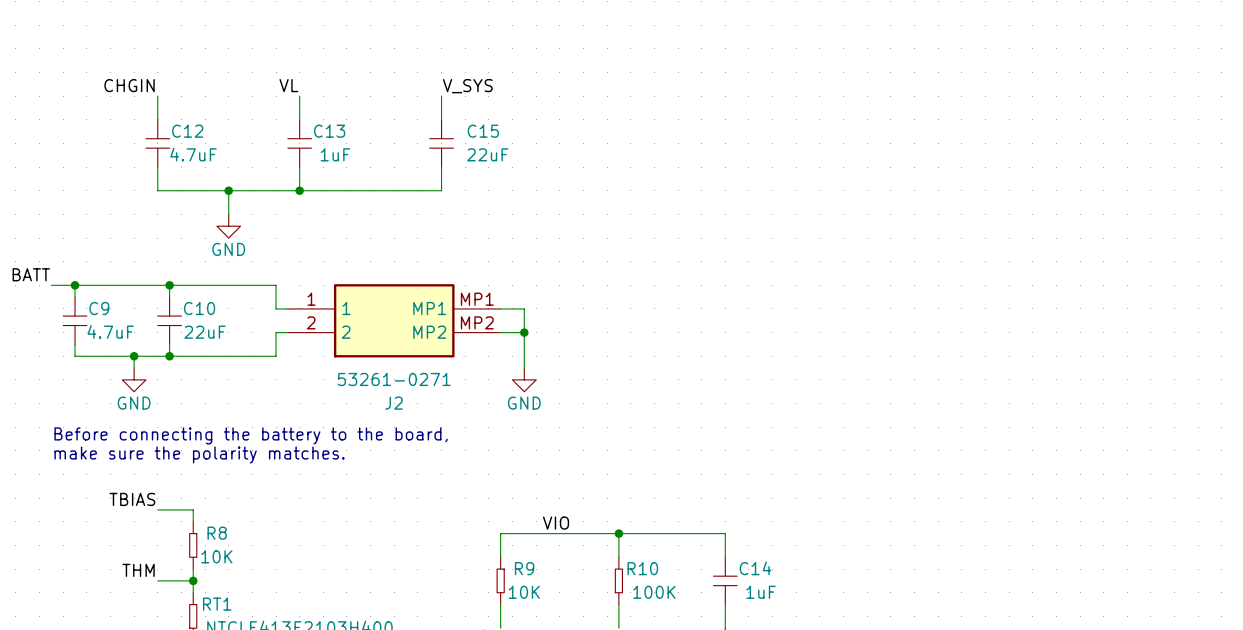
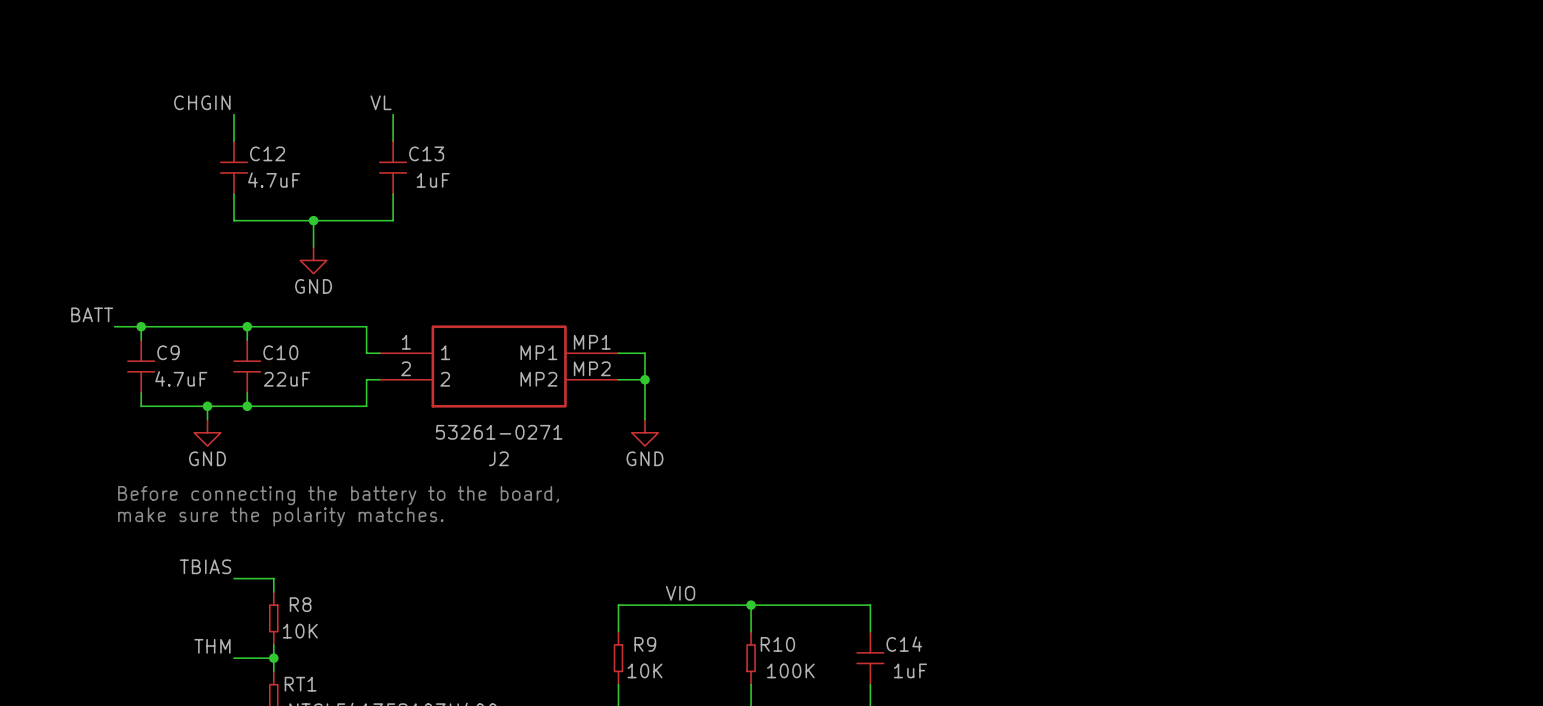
label: V_SYS (467, 86) -> none
wire: (441, 96) (441, 119) -> none
C15: 22uF (441, 143) -> none
wire: (441, 167) (441, 190) (299, 190) -> none
junction: (299, 190) -> none

